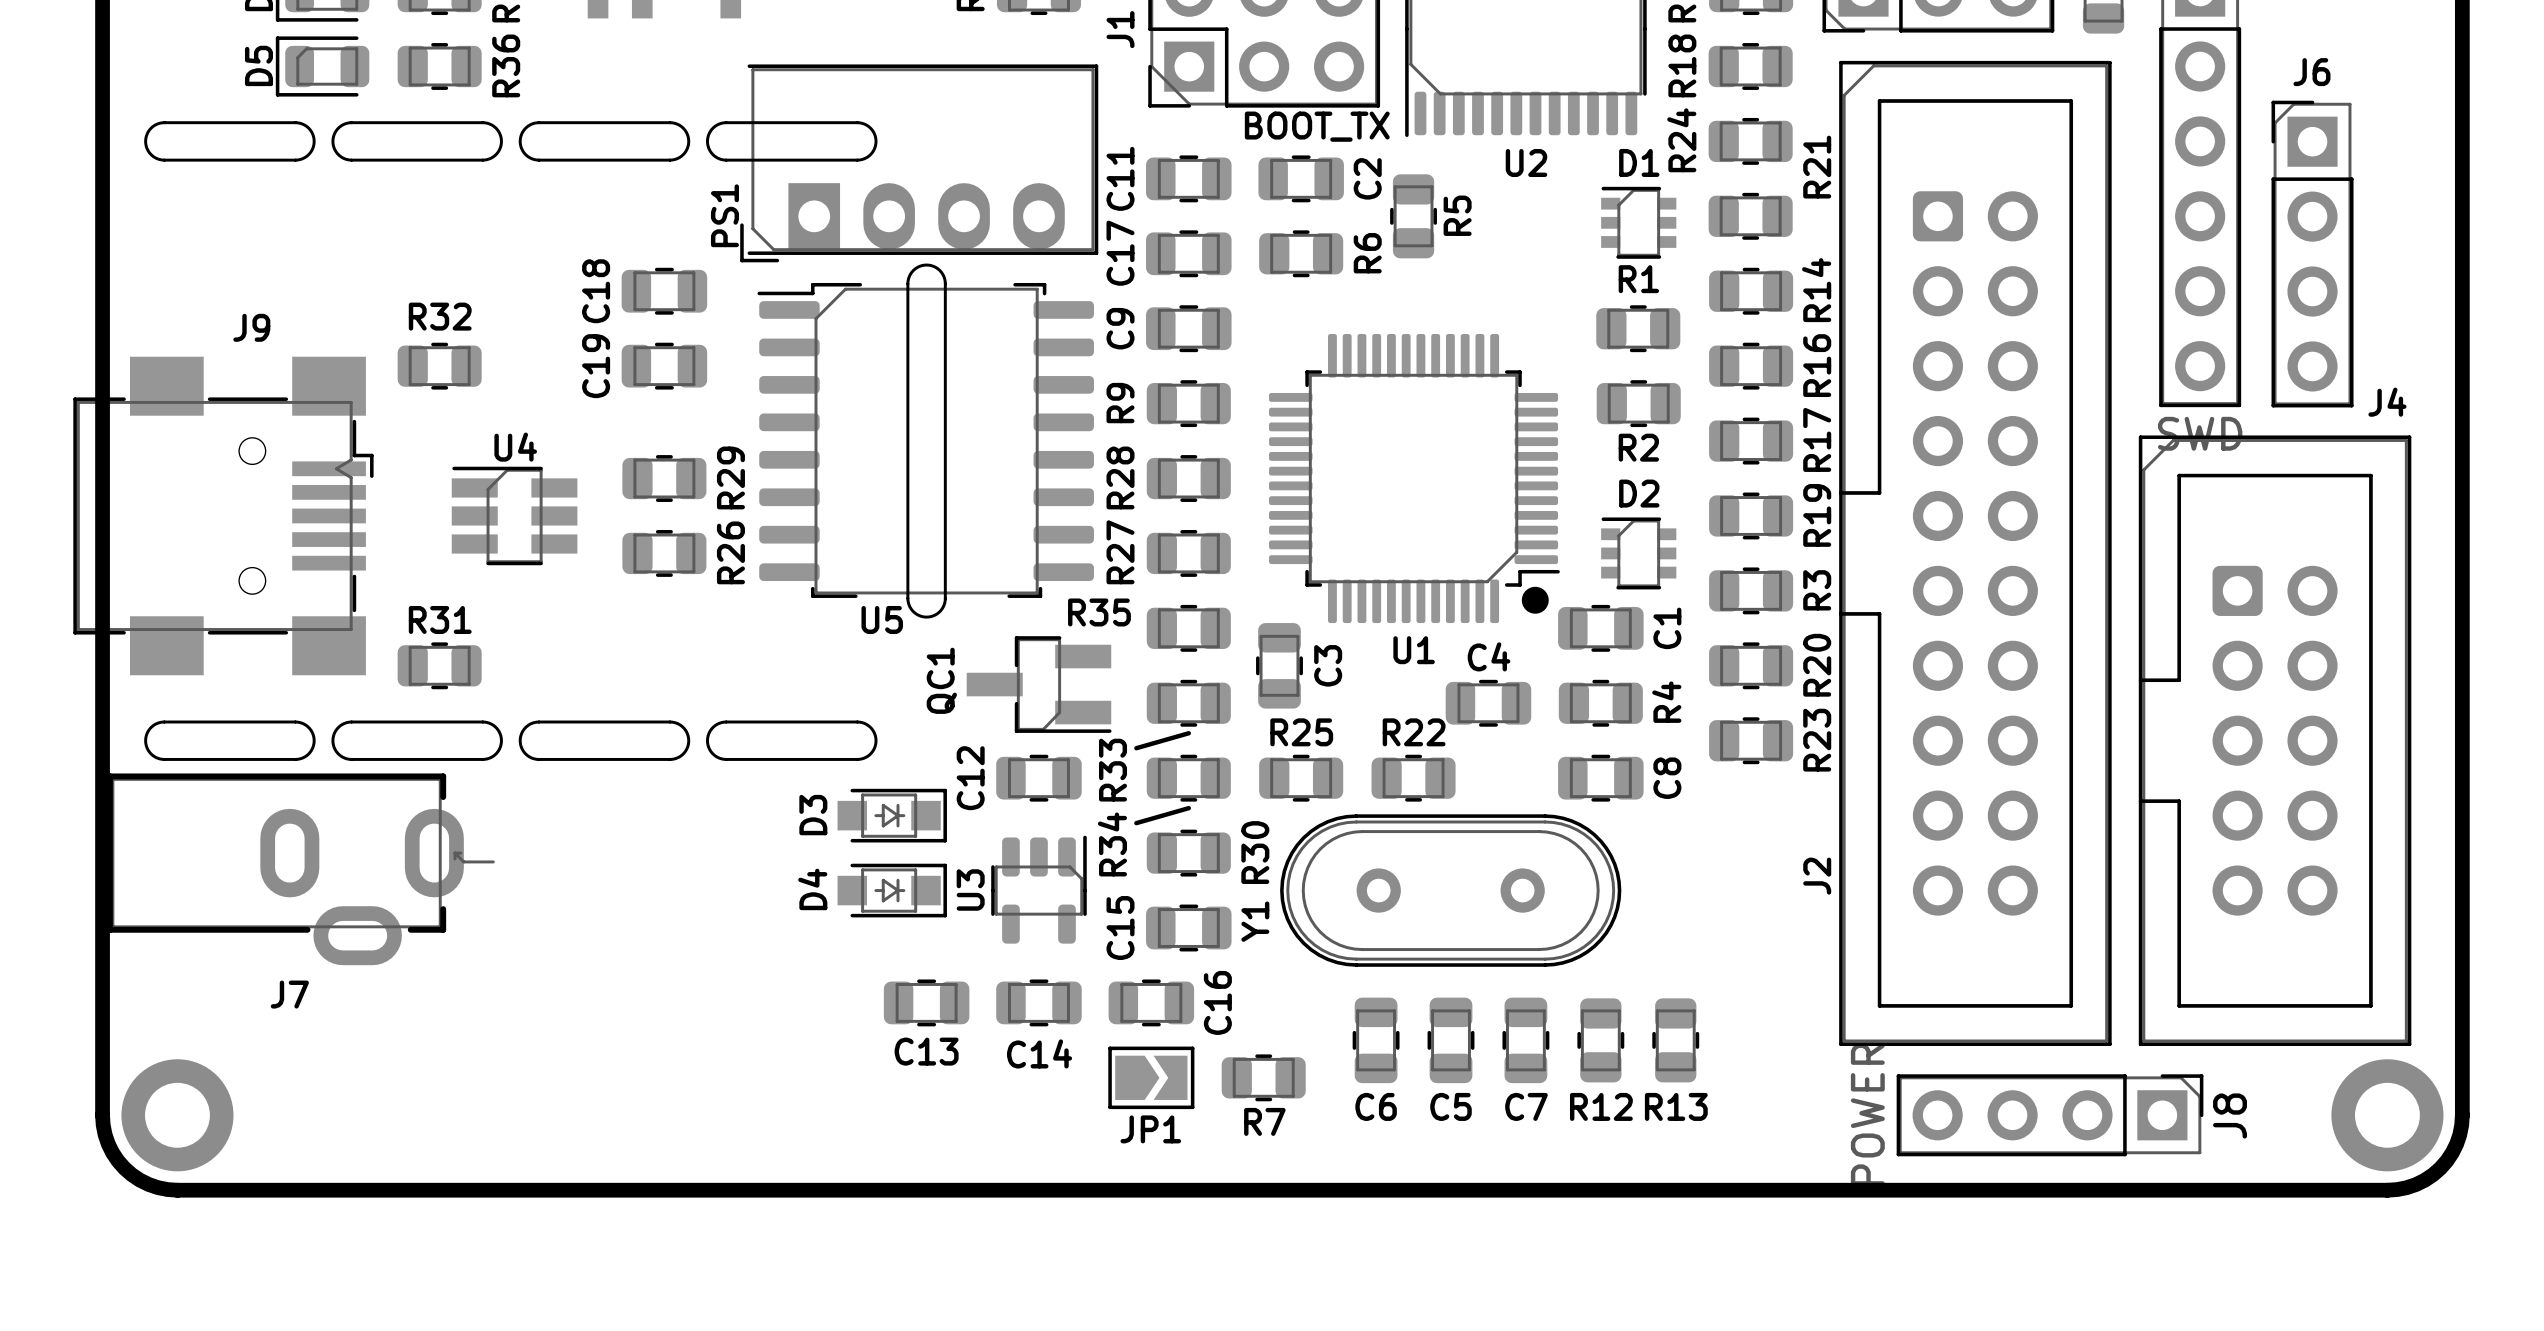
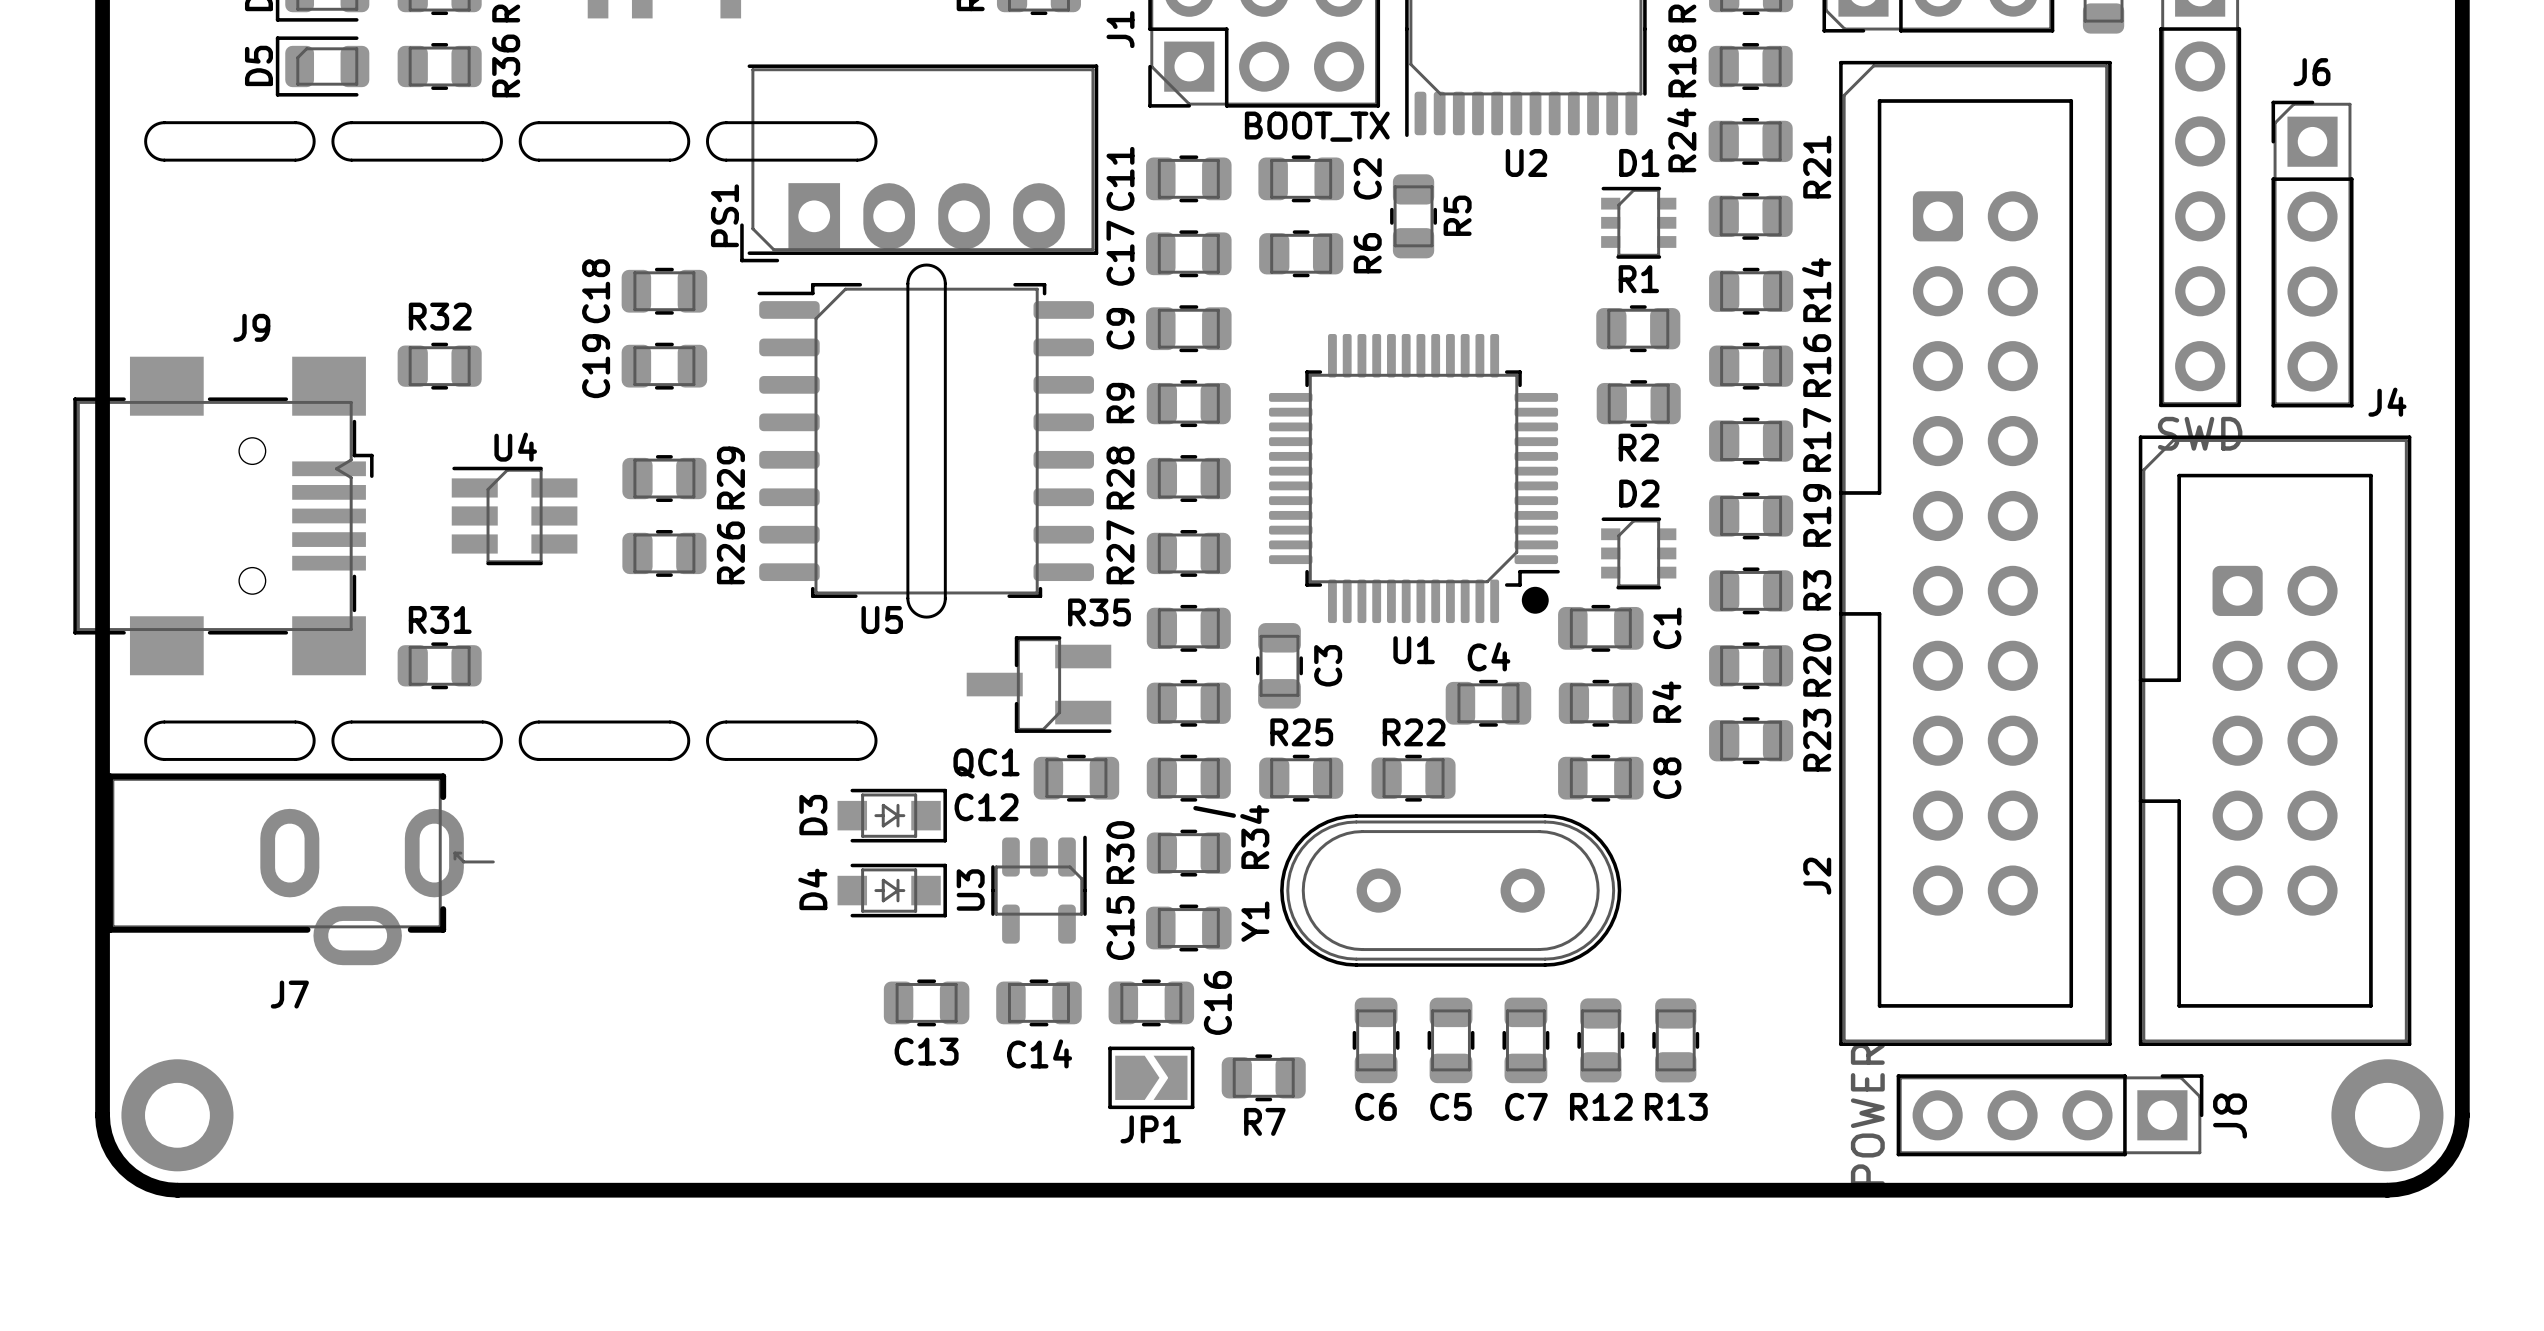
QC1 name rotation: 0° (941, 680) -> 90° clockwise (986, 763)
QC1 name position: QC1 (941, 680) -> QC1 (986, 763)
line: (1188, 733) (1136, 748) -> none
R33 name: R33 (1113, 770) -> none
C12 name rotation: 0° (970, 778) -> 90° clockwise (986, 807)
C12 position: (1038, 778) -> (1076, 778)
line: (1188, 808) (1136, 823) -> none
line: none -> (1195, 808) (1233, 815)
R34 name position: R34 (1112, 844) -> R34 (1254, 836)
R30 name position: R30 (1255, 852) -> R30 (1120, 852)

